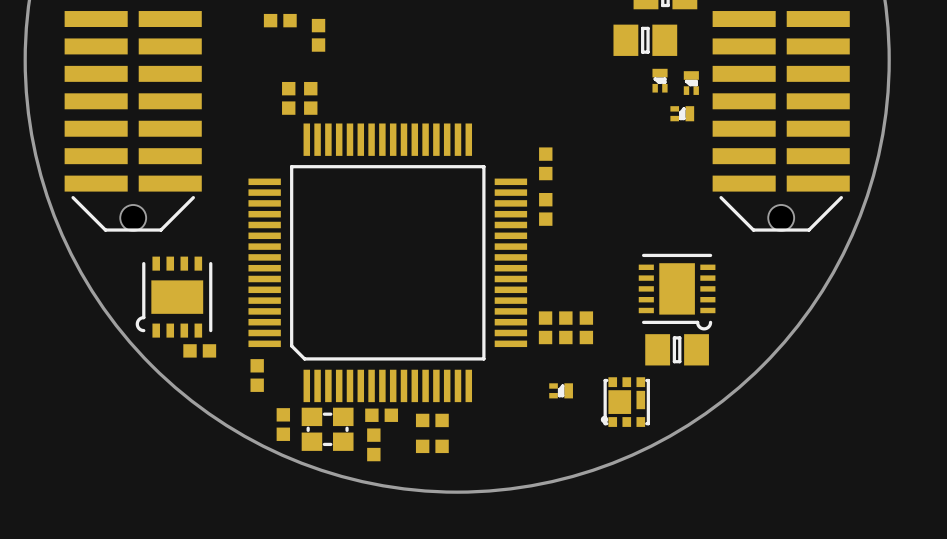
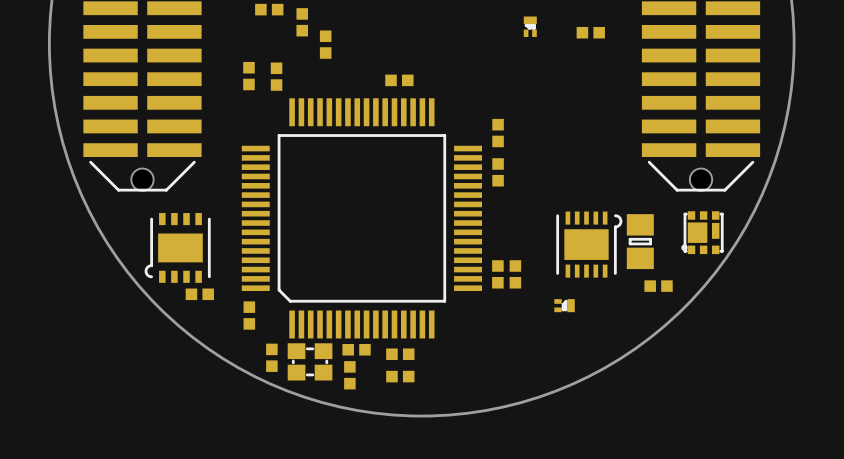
part footprint: [613, 24, 678, 56] -> [576, 26, 605, 39]
part: none -> (530, 26)
part: none -> (325, 44)
part: (660, 80) -> none
part: (691, 83) -> none
part: none -> (248, 76)
part: (310, 98) -> none
part: none -> (399, 80)
part: (682, 113) -> none
part rotation: 0° (677, 292) -> 90° counterclockwise (589, 244)
part: (586, 327) -> none
part: none -> (658, 286)
part rotation: 0° (677, 349) -> 90° clockwise (640, 241)
part position: (677, 349) -> (640, 241)
part position: (561, 390) -> (564, 305)
part position: (625, 402) -> (702, 232)

